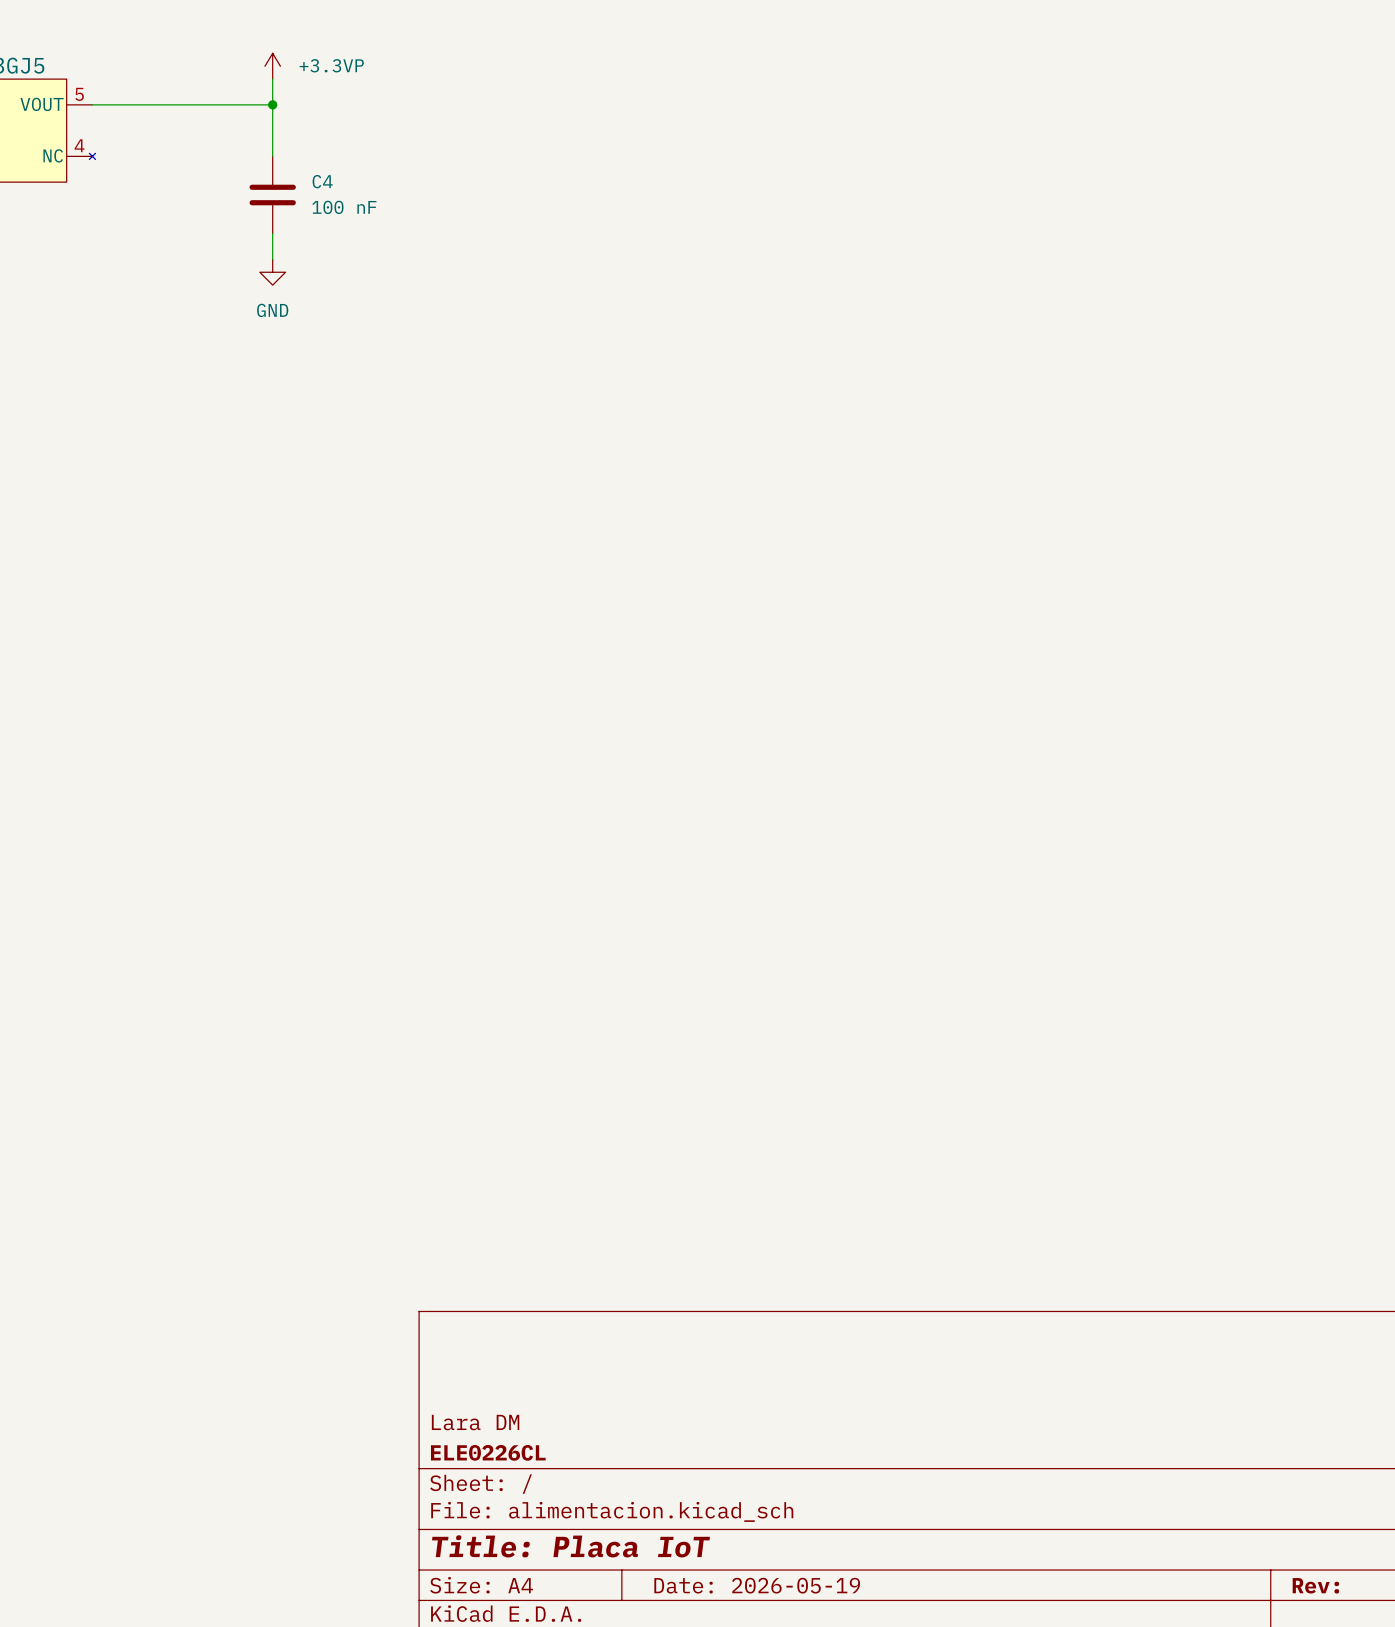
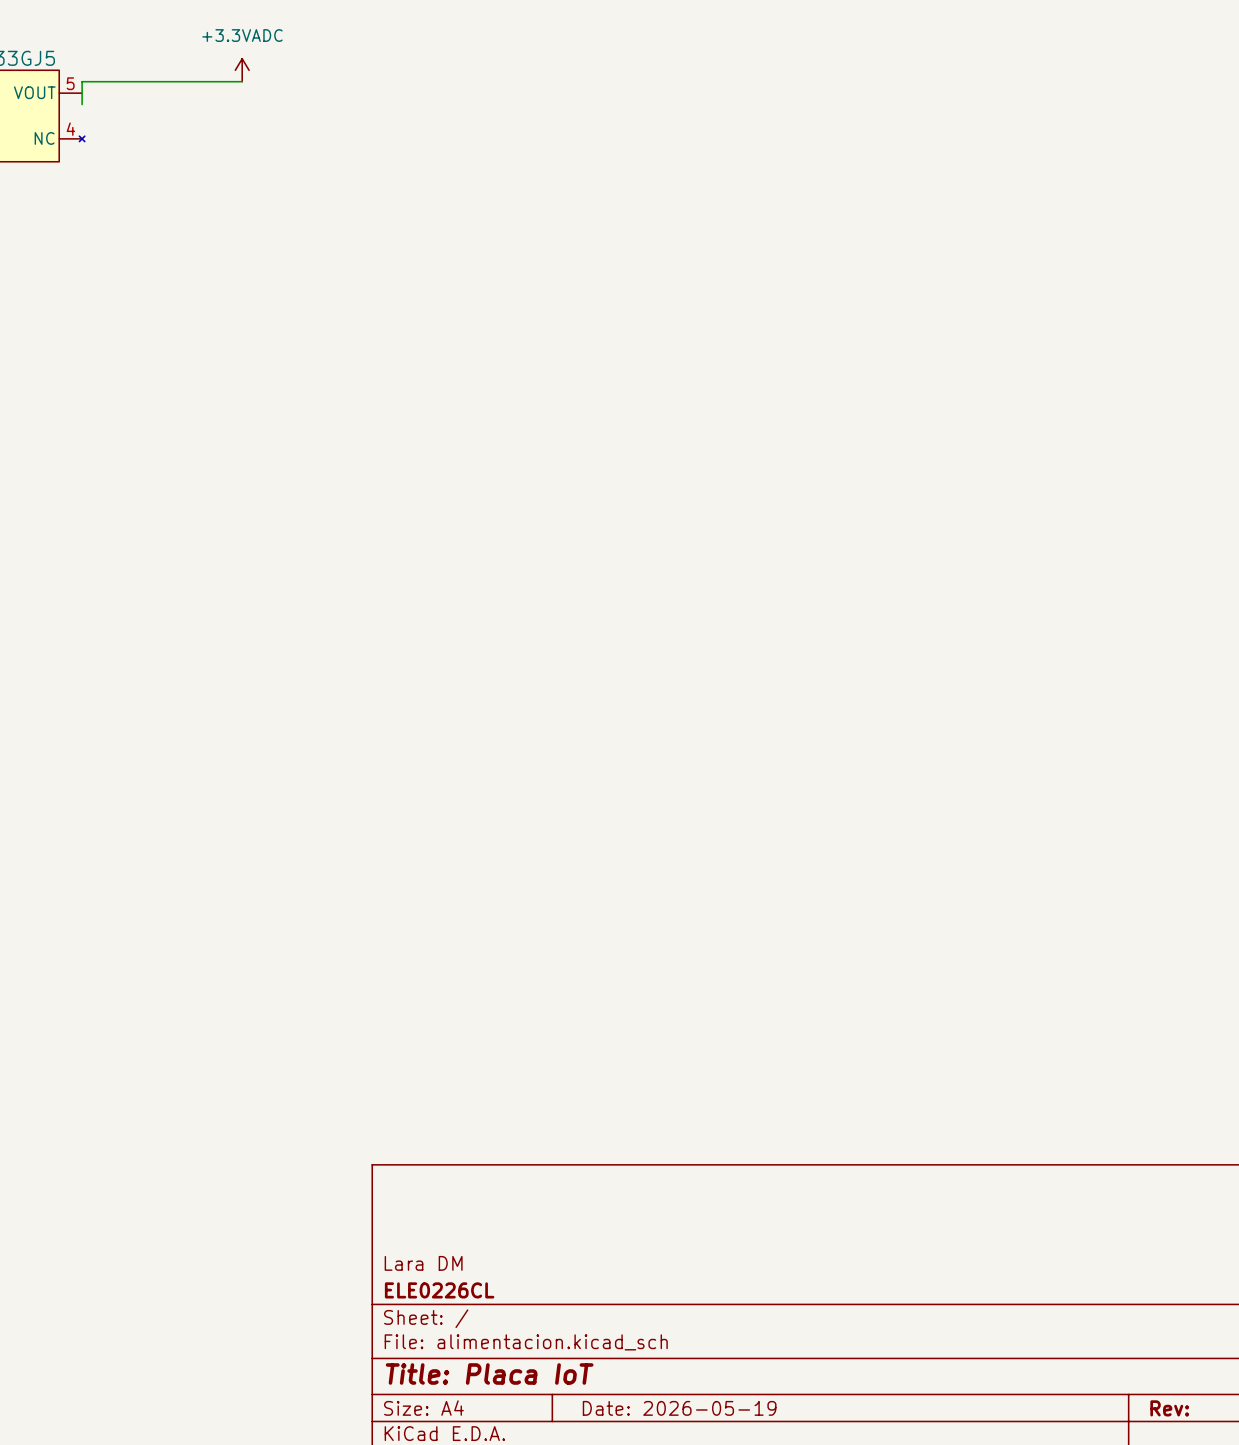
power symbol: +3.3VP (272, 66) -> none
wire: (272, 79) (272, 156) -> none
power symbol: none -> +3.3VADC (242, 70)
wire: none -> (242, 81) (82, 81) (82, 104)
wire: (92, 104) (272, 104) -> none
junction: (272, 104) -> none
C4: 100 nF (272, 195) -> none
wire: (272, 233) (272, 259) -> none
power symbol: GND (272, 272) -> none

